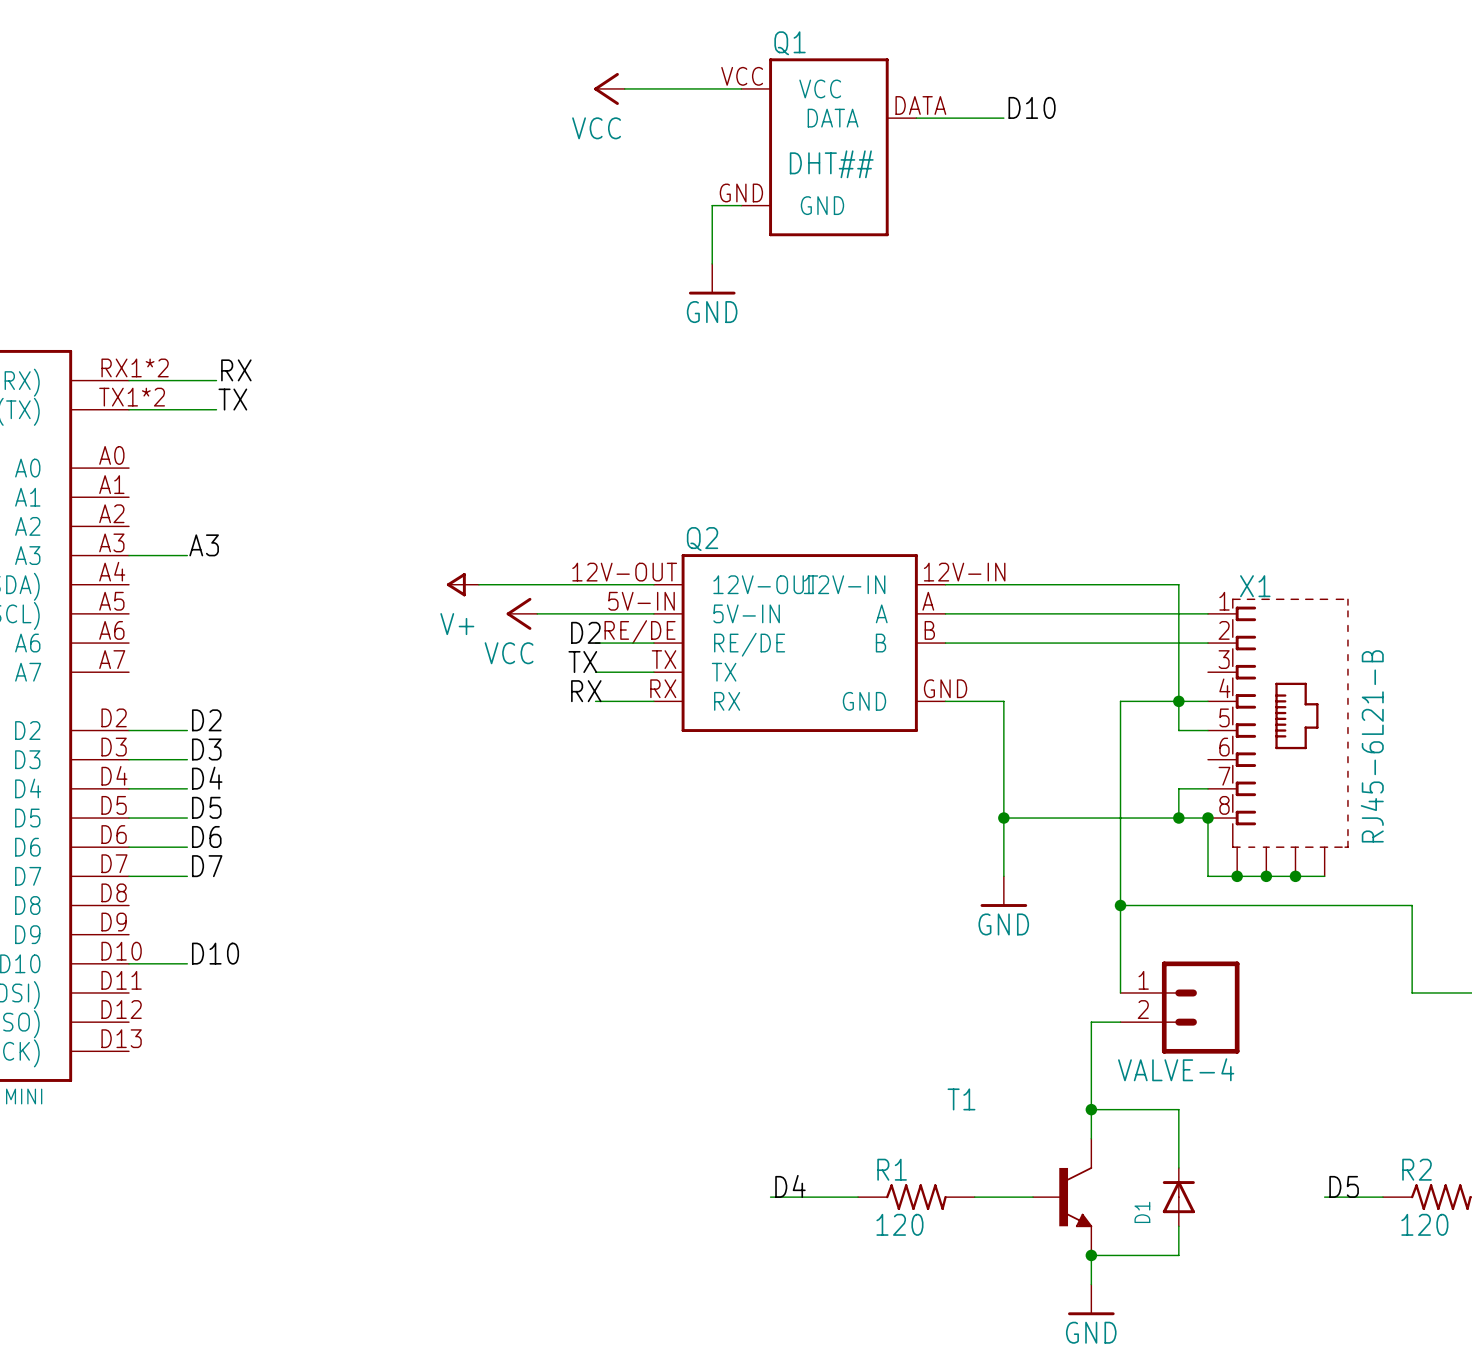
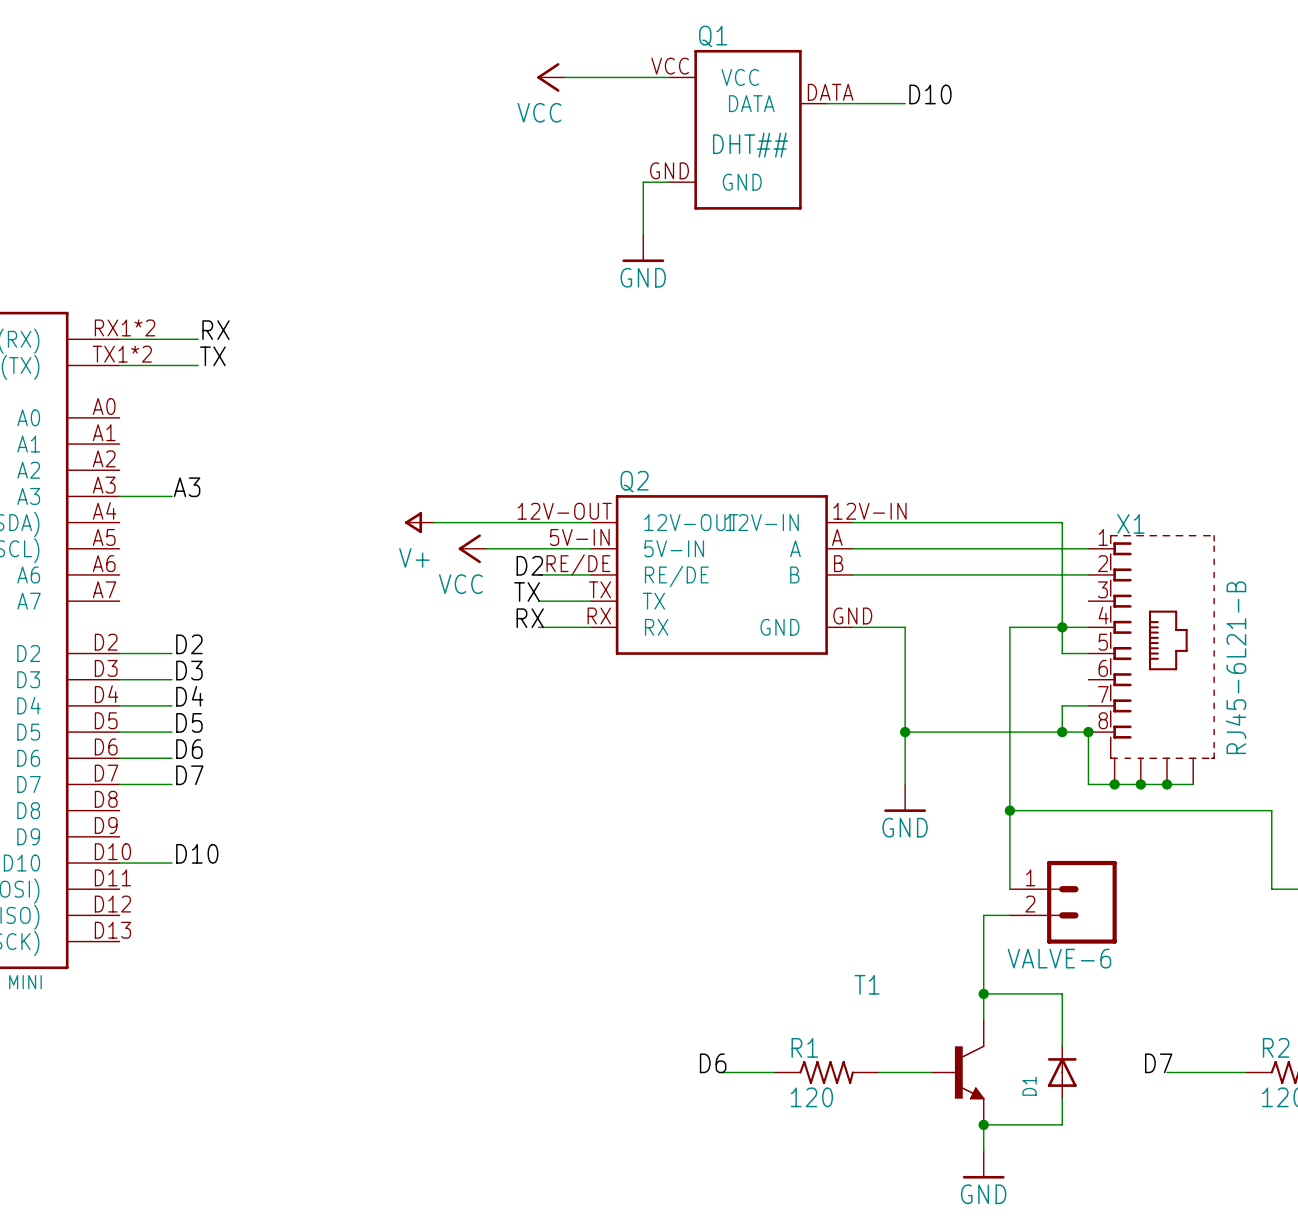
VALVE-4 name: VALVE-4 (1176, 1069) -> VALVE-6 (1059, 958)
label: D4 (790, 1186) -> D6 (713, 1063)
label: none -> D7 (1158, 1063)
label: D5 (1344, 1186) -> none
wire: (770, 1197) (799, 1197) -> none
wire: none -> (1167, 1072) (1193, 1072)

